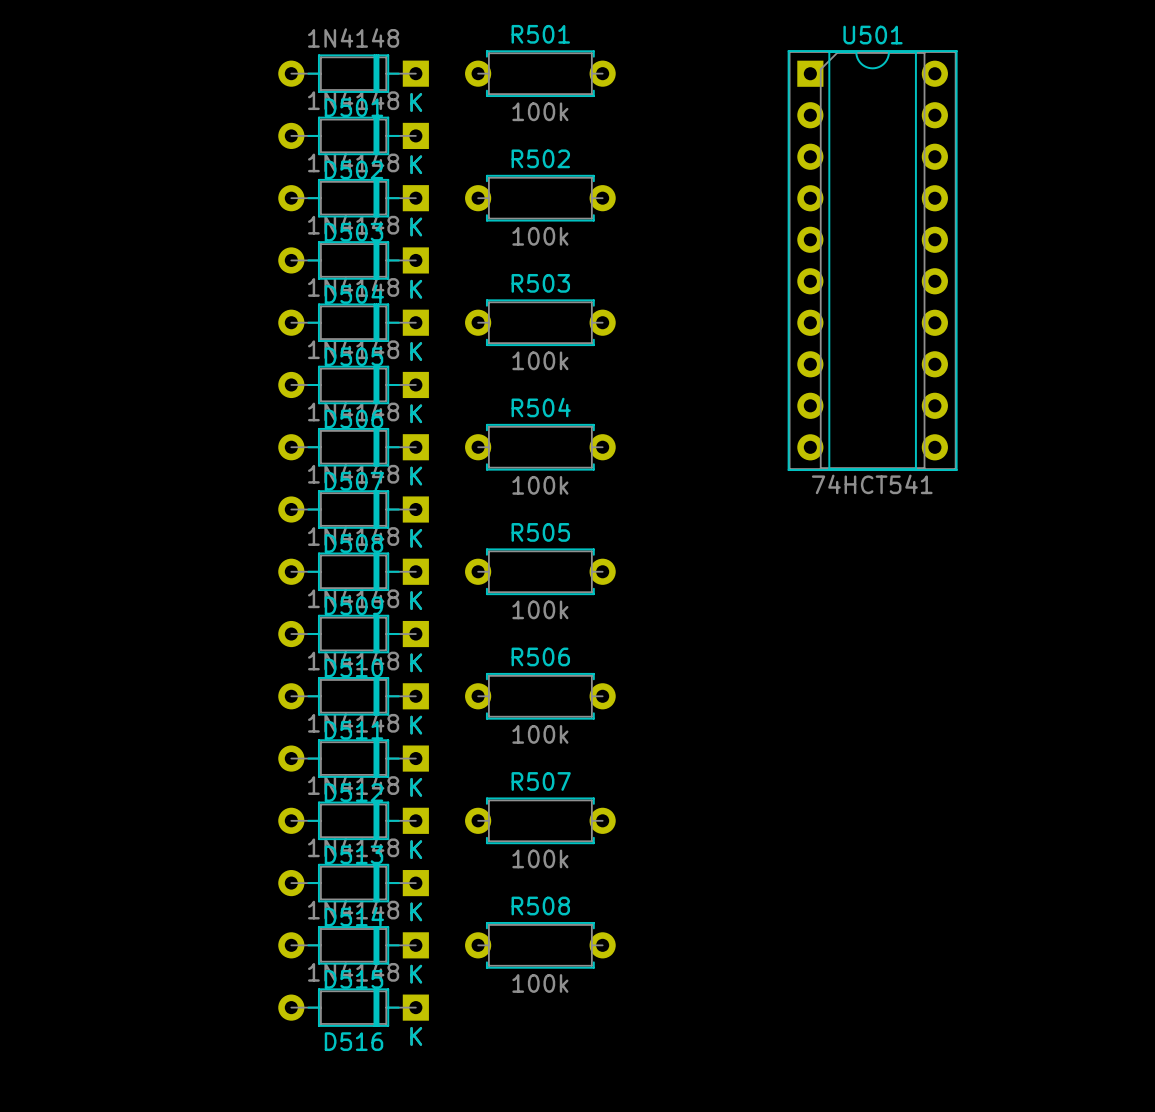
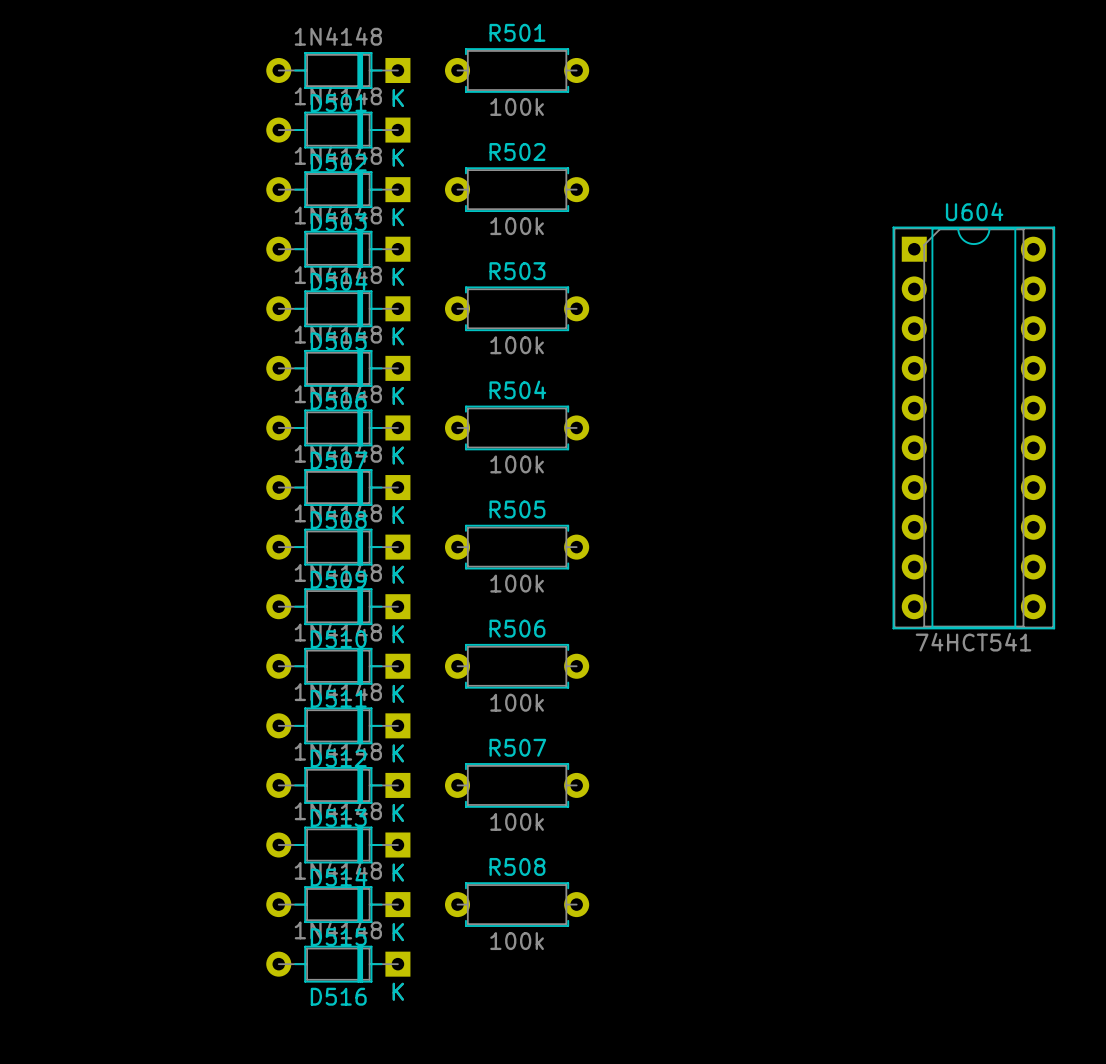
U501: 74HCT541 (872, 260) -> none
U604: none -> 74HCT541 (973, 427)

